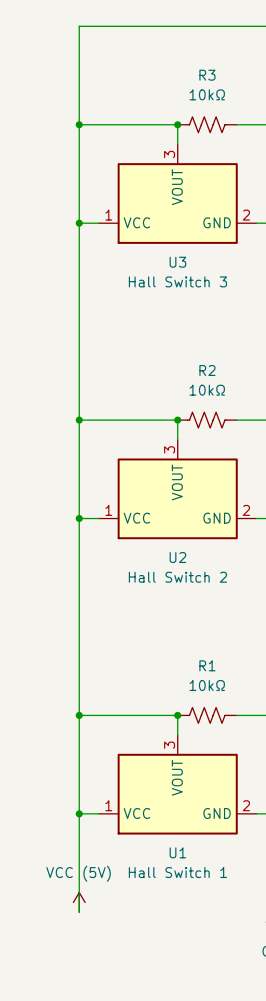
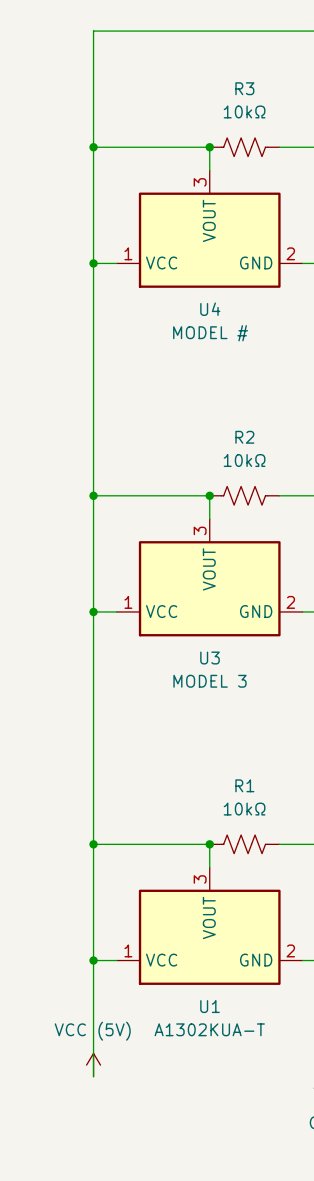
U3 name: U3 (177, 262) -> U4 (210, 309)
U3 value: Hall Switch 3 (177, 281) -> MODEL # (210, 333)
U2 name: U2 (177, 557) -> U3 (210, 658)
U2 value: Hall Switch 2 (177, 577) -> MODEL 3 (210, 681)
U1 value: Hall Switch 1 (177, 872) -> A1302KUA-T (209, 1029)

